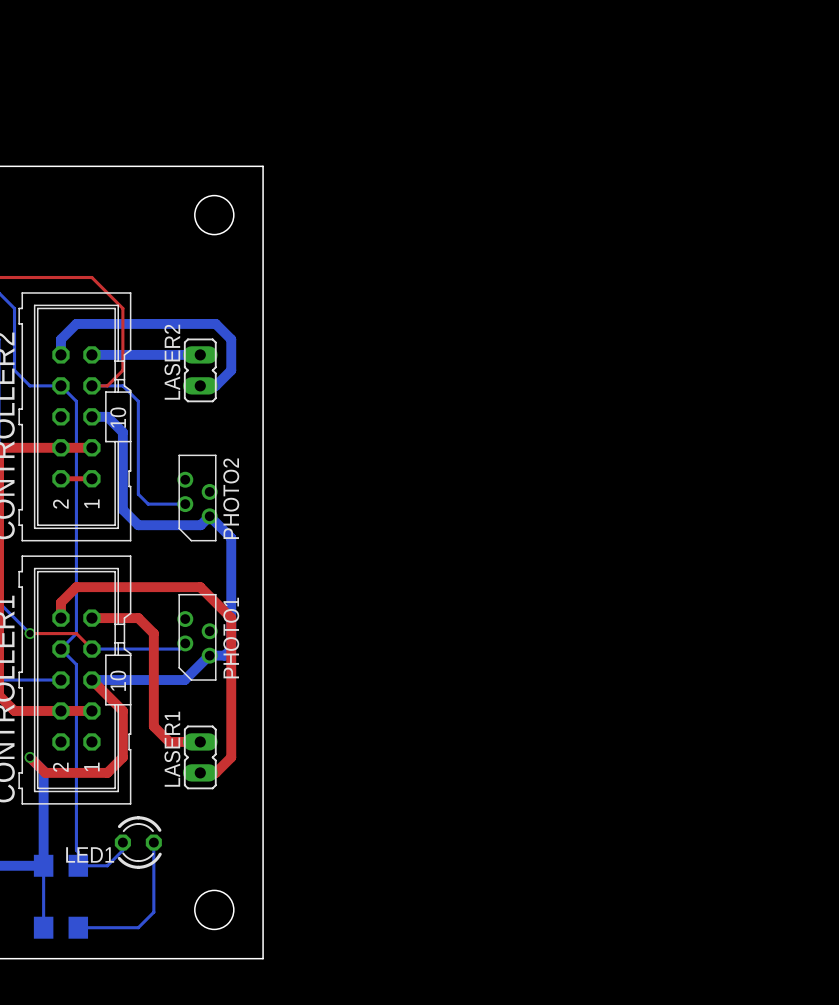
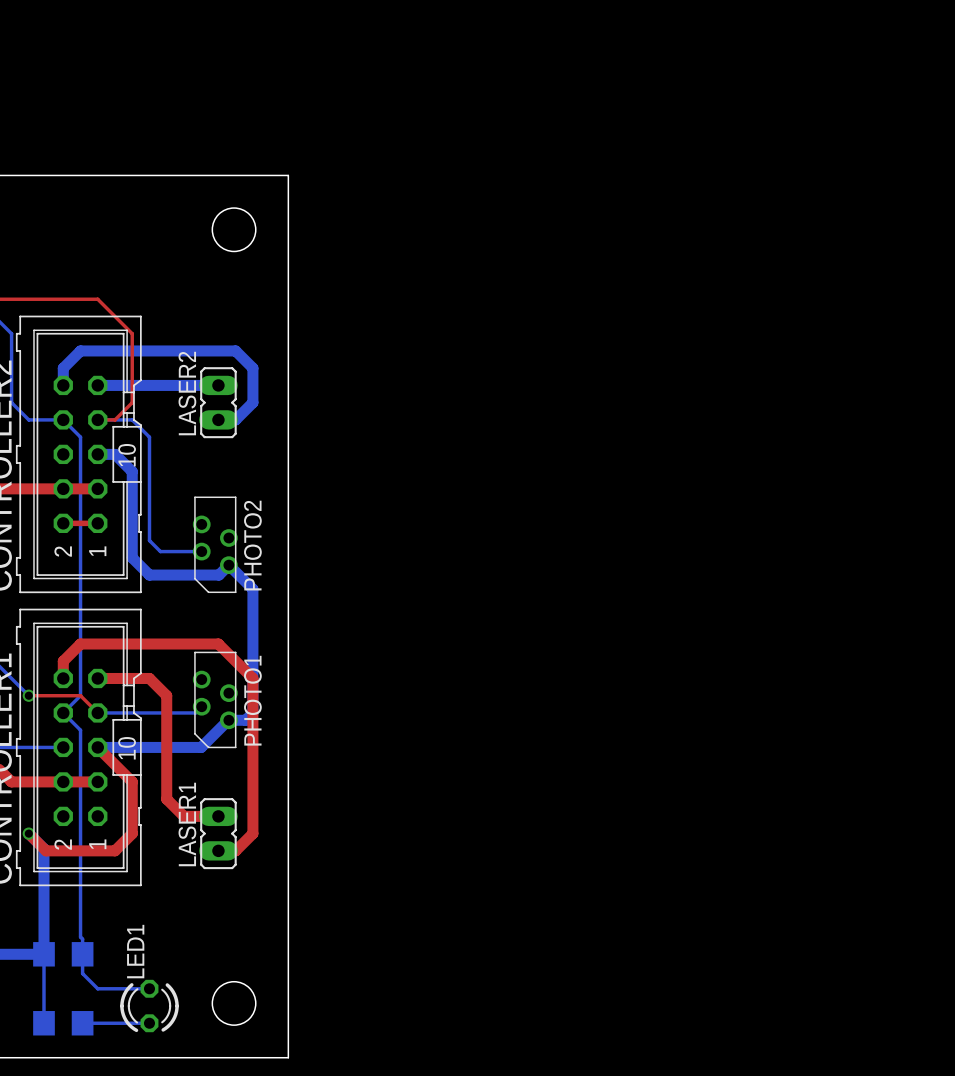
bottom track: (122, 842) (122, 850) (107, 865) (78, 865) -> (149, 988) (97, 988) (82, 973) (82, 954)
LED1 rotation: 0° (138, 842) -> 90° clockwise (149, 1006)
LED1 position: (138, 842) -> (149, 1006)
bottom track: (153, 842) (153, 912) (138, 927) -> none

